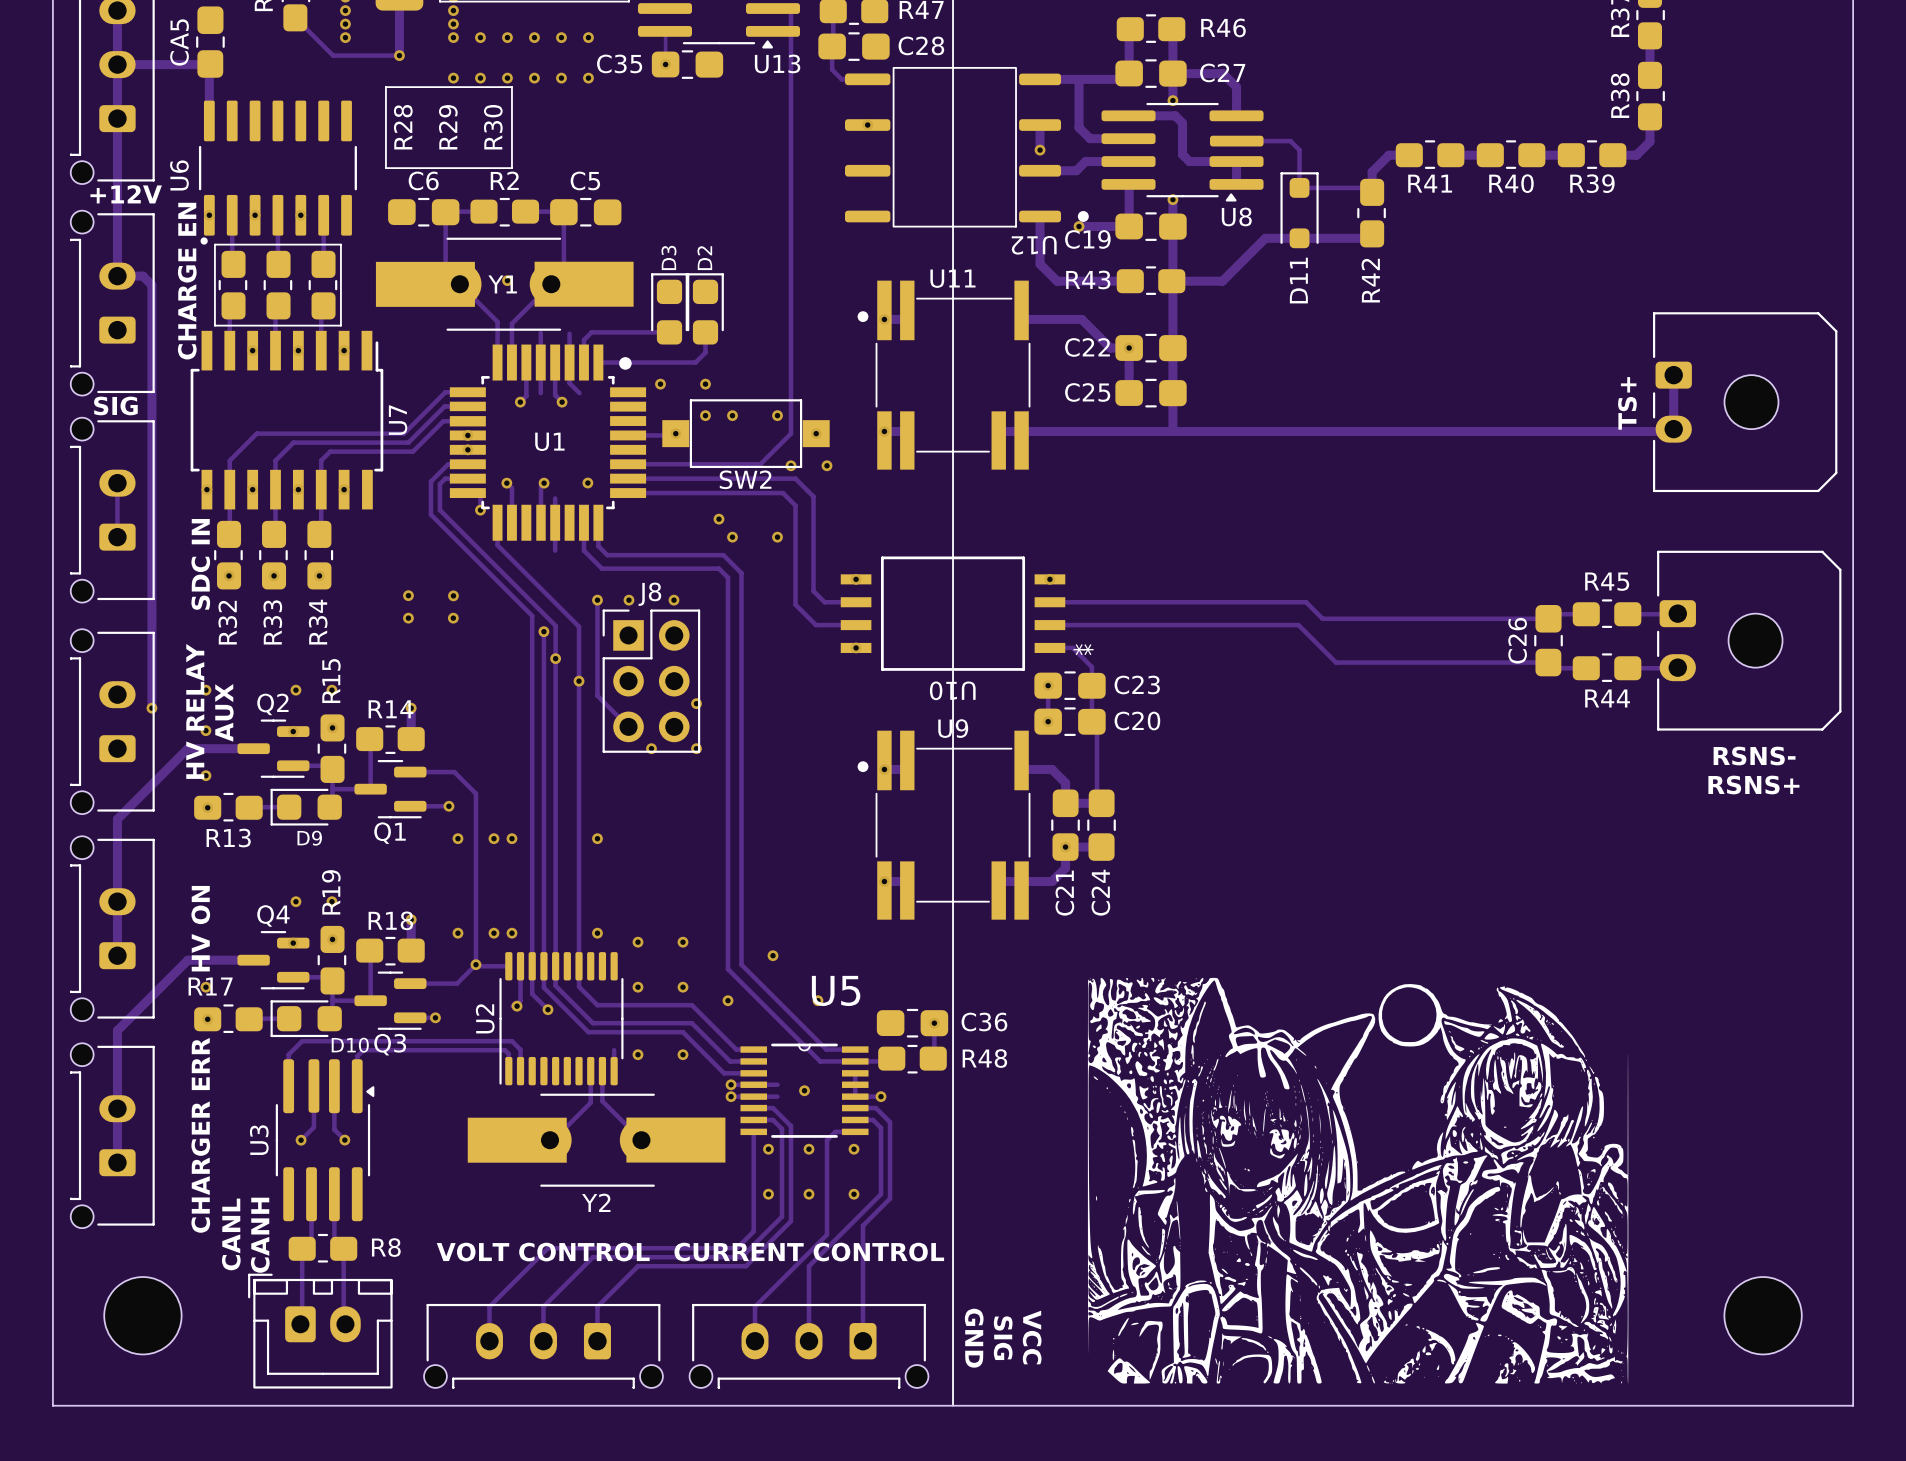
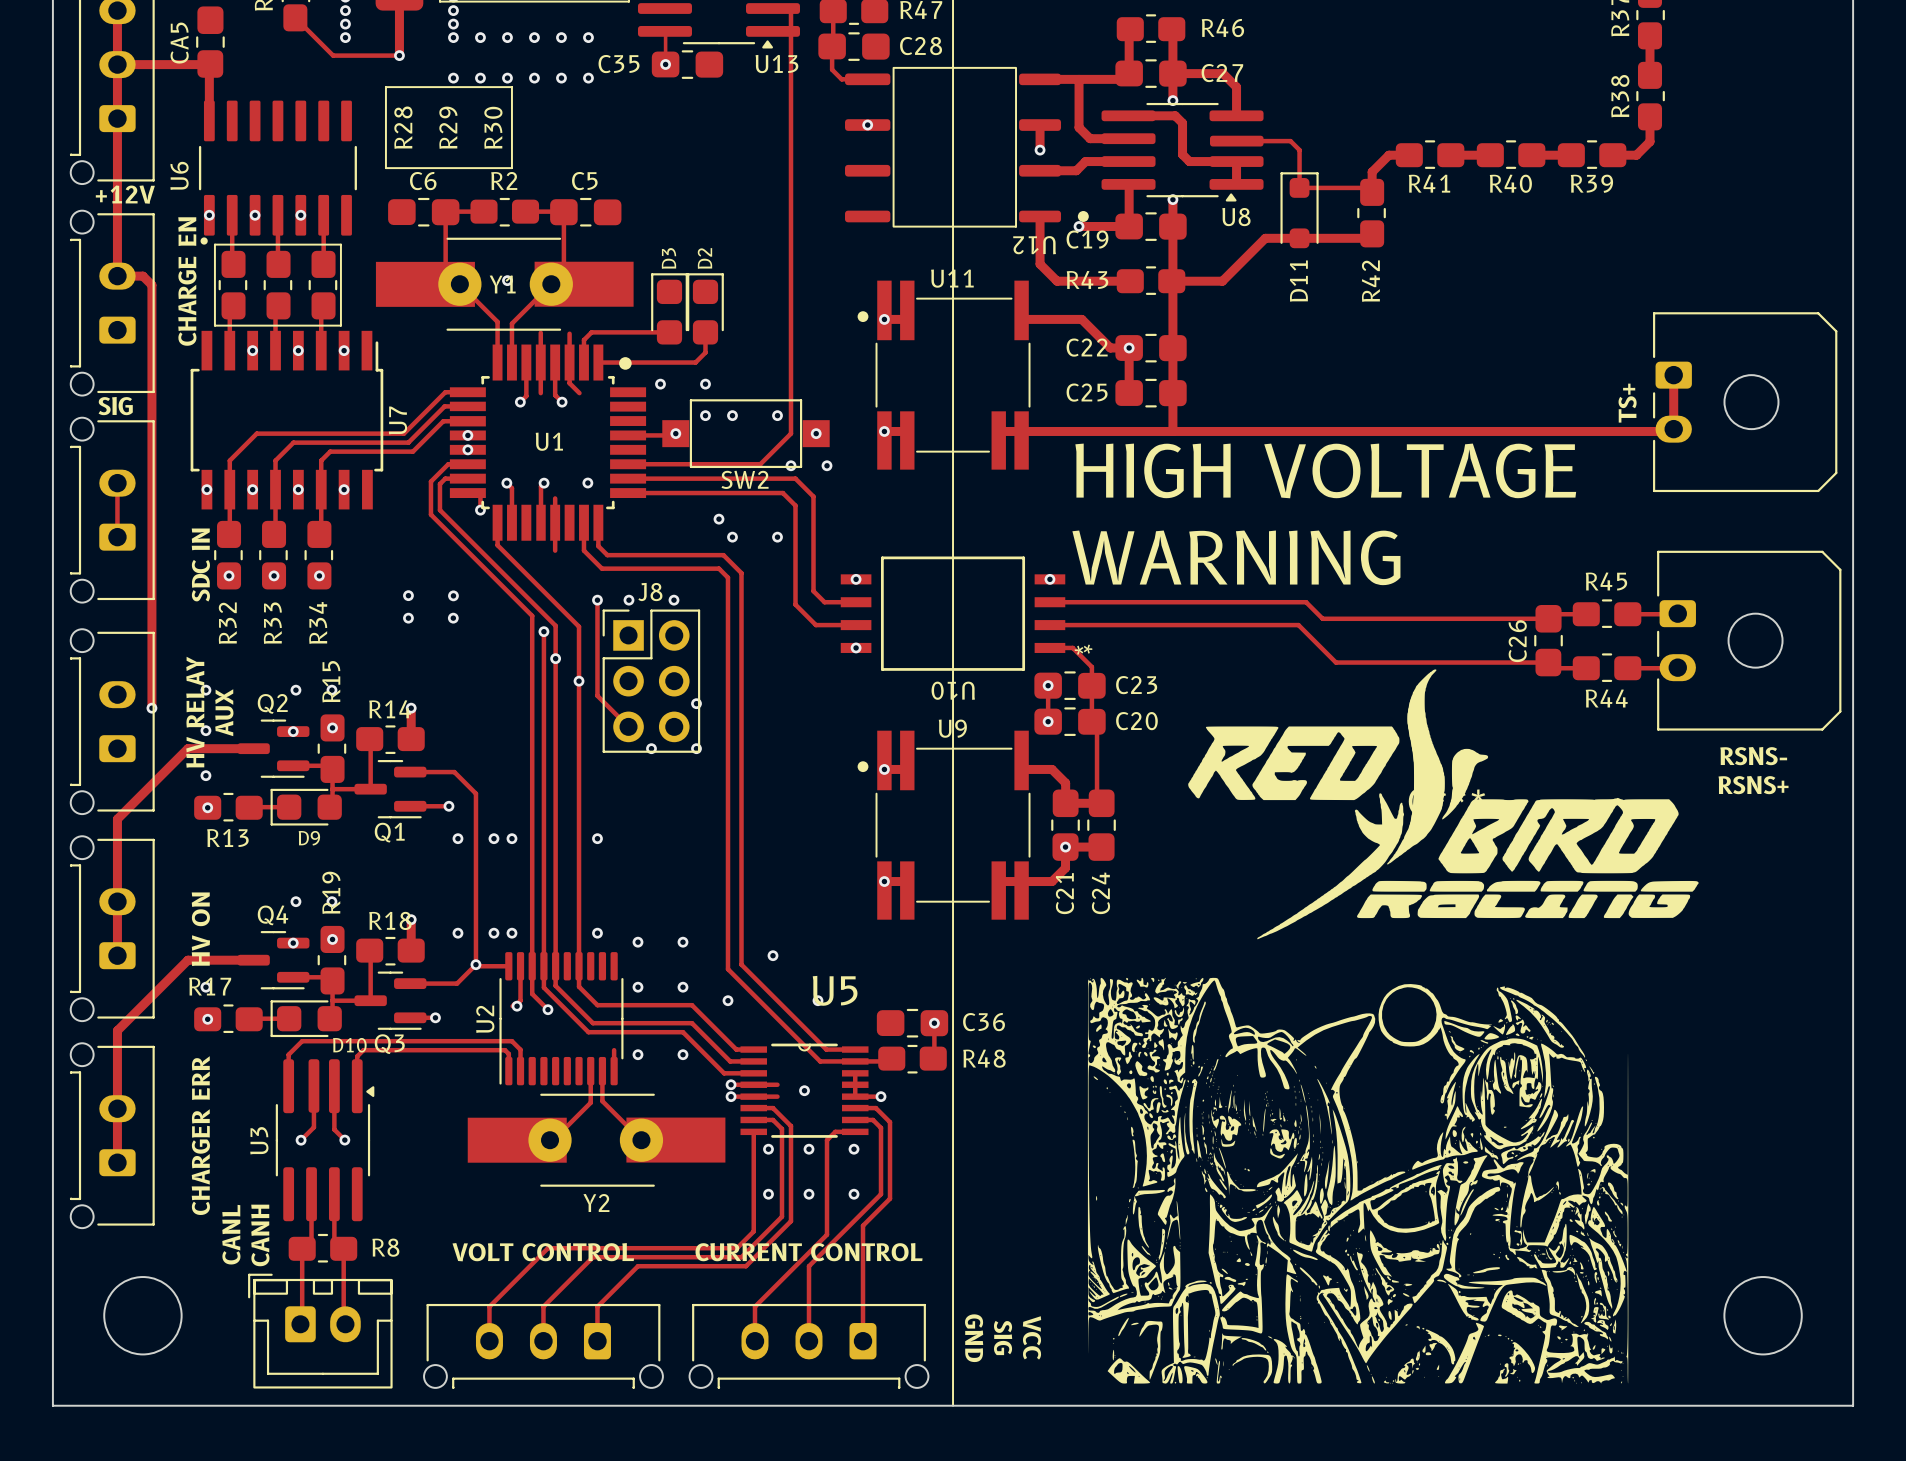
text: none -> HIGH VOLTAGE (1325, 470)
text: none -> WARNING (1236, 557)
part: none -> (1443, 804)

